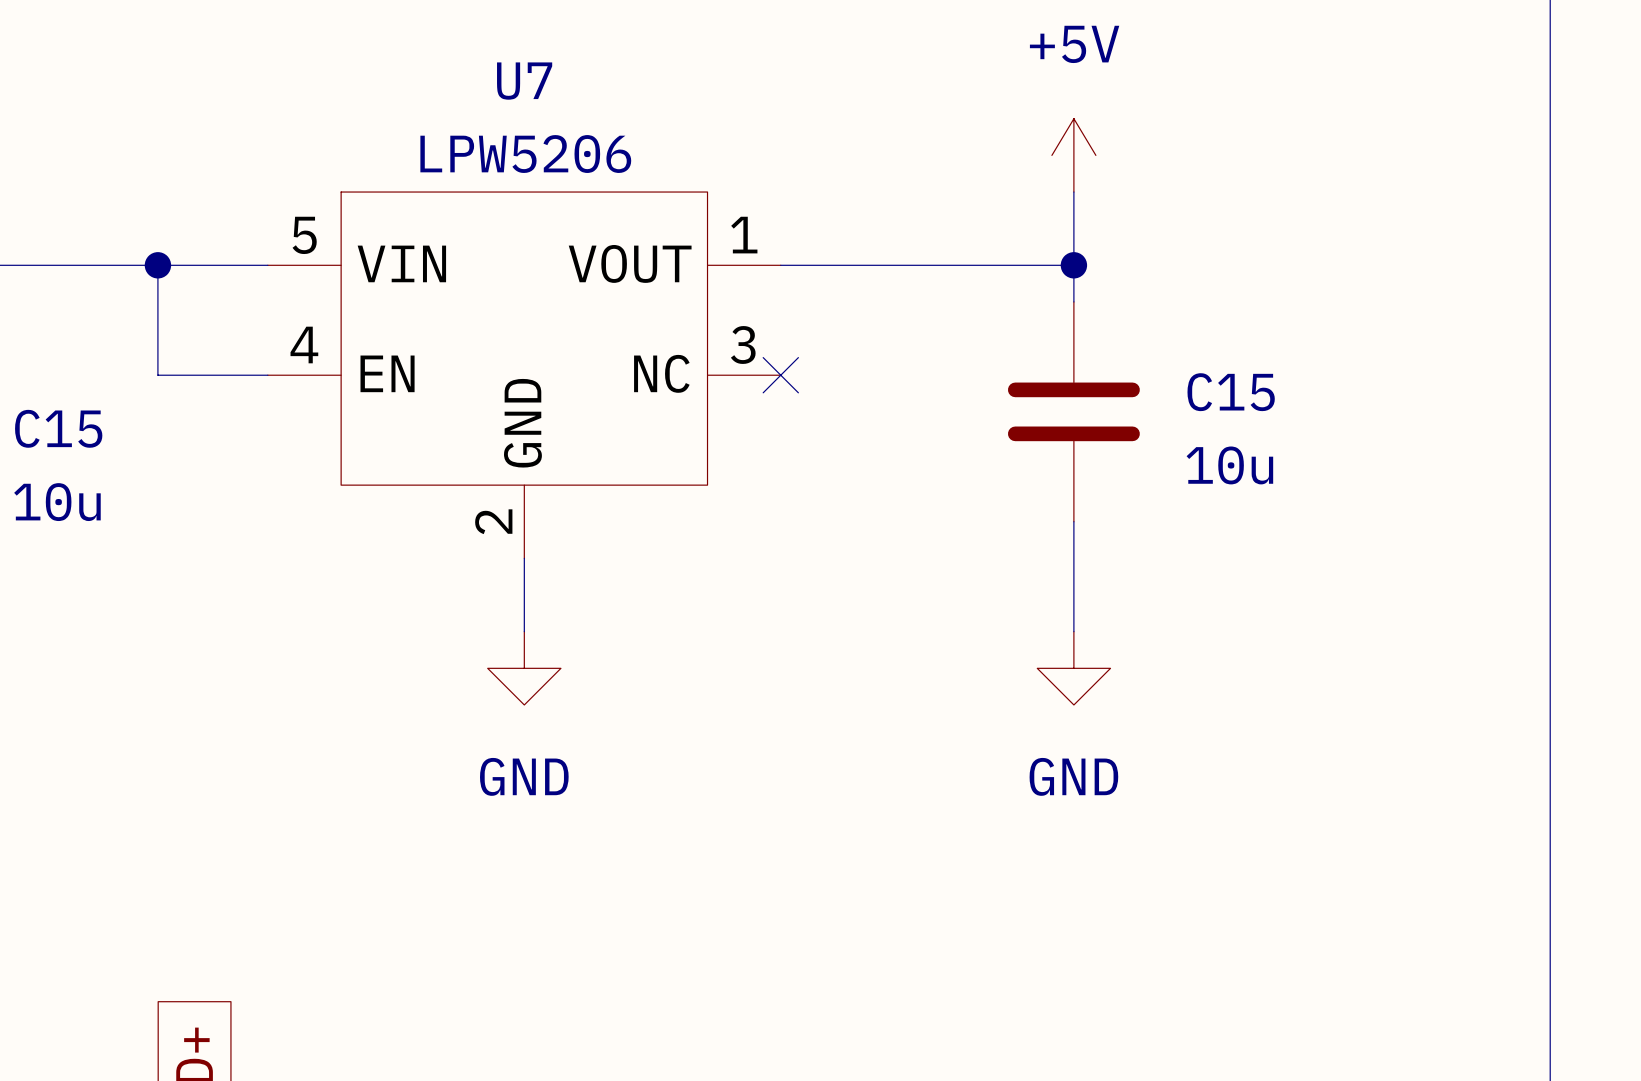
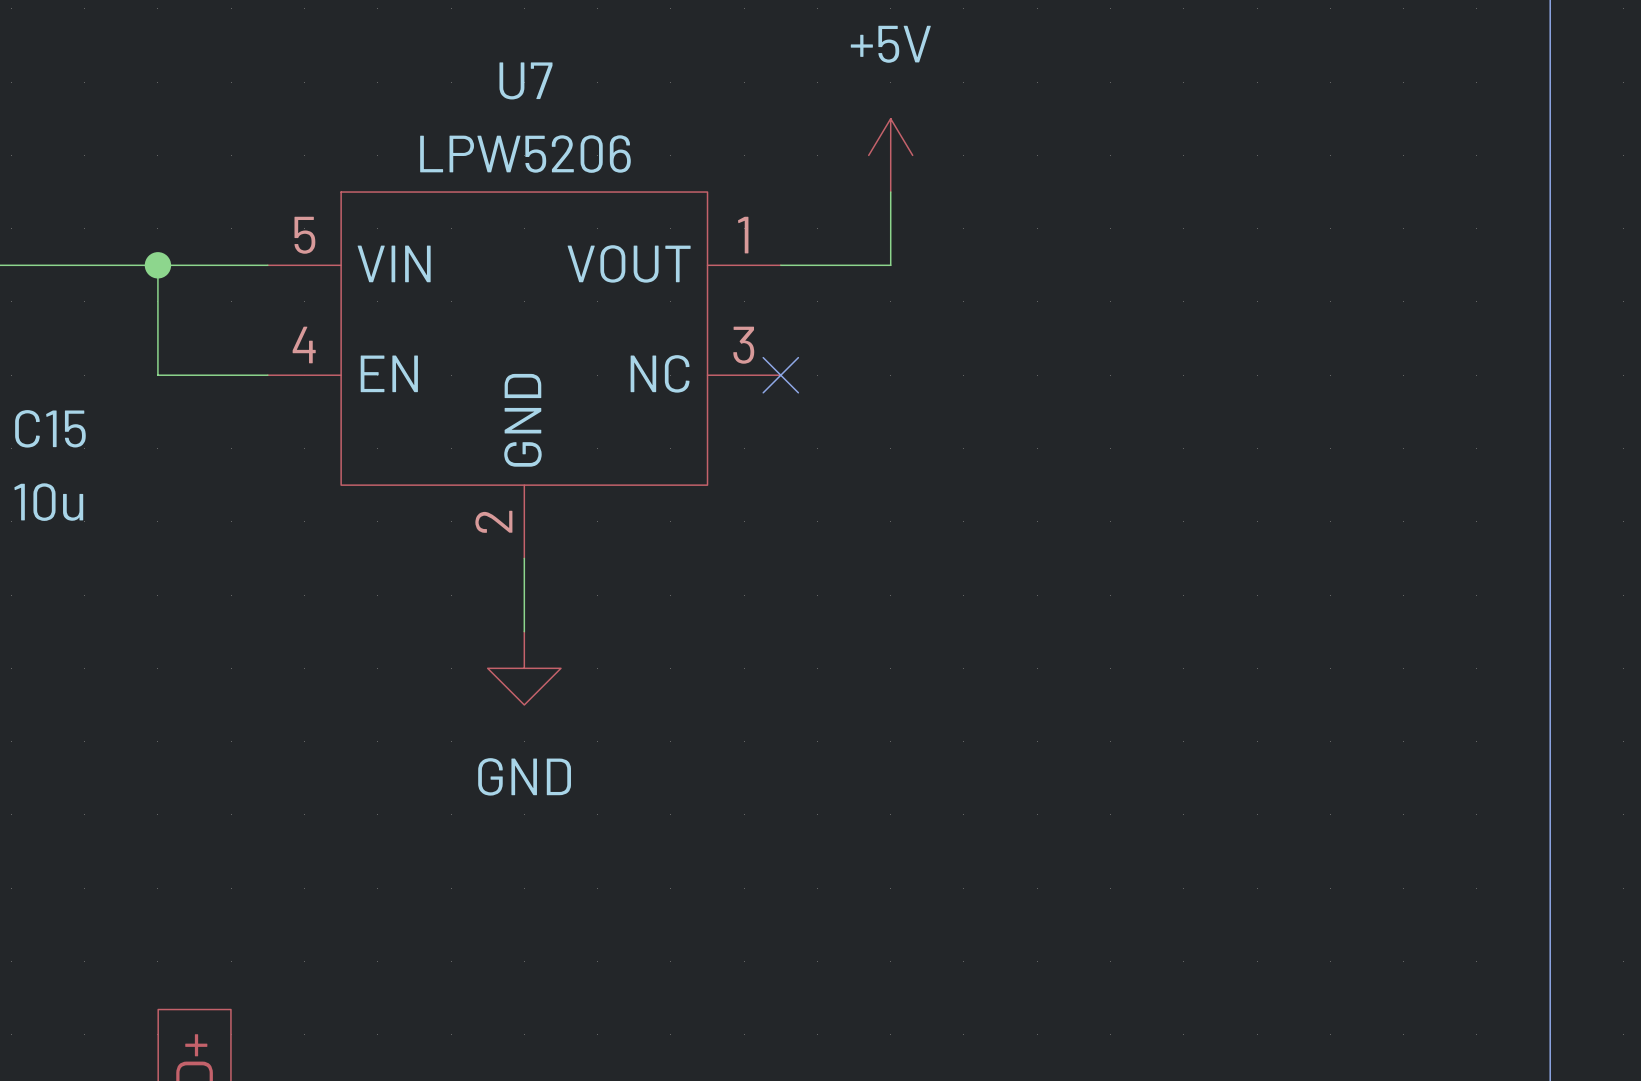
power symbol position: +5V (1073, 155) -> +5V (890, 155)
wire: (1073, 192) (1073, 301) -> none
wire: (890, 265) (1073, 265) -> (890, 265) (890, 192)
junction: (1073, 265) -> none
C15: 10u (1073, 411) -> none
wire: (1073, 521) (1073, 631) -> none
power symbol: GND (1073, 668) -> none

